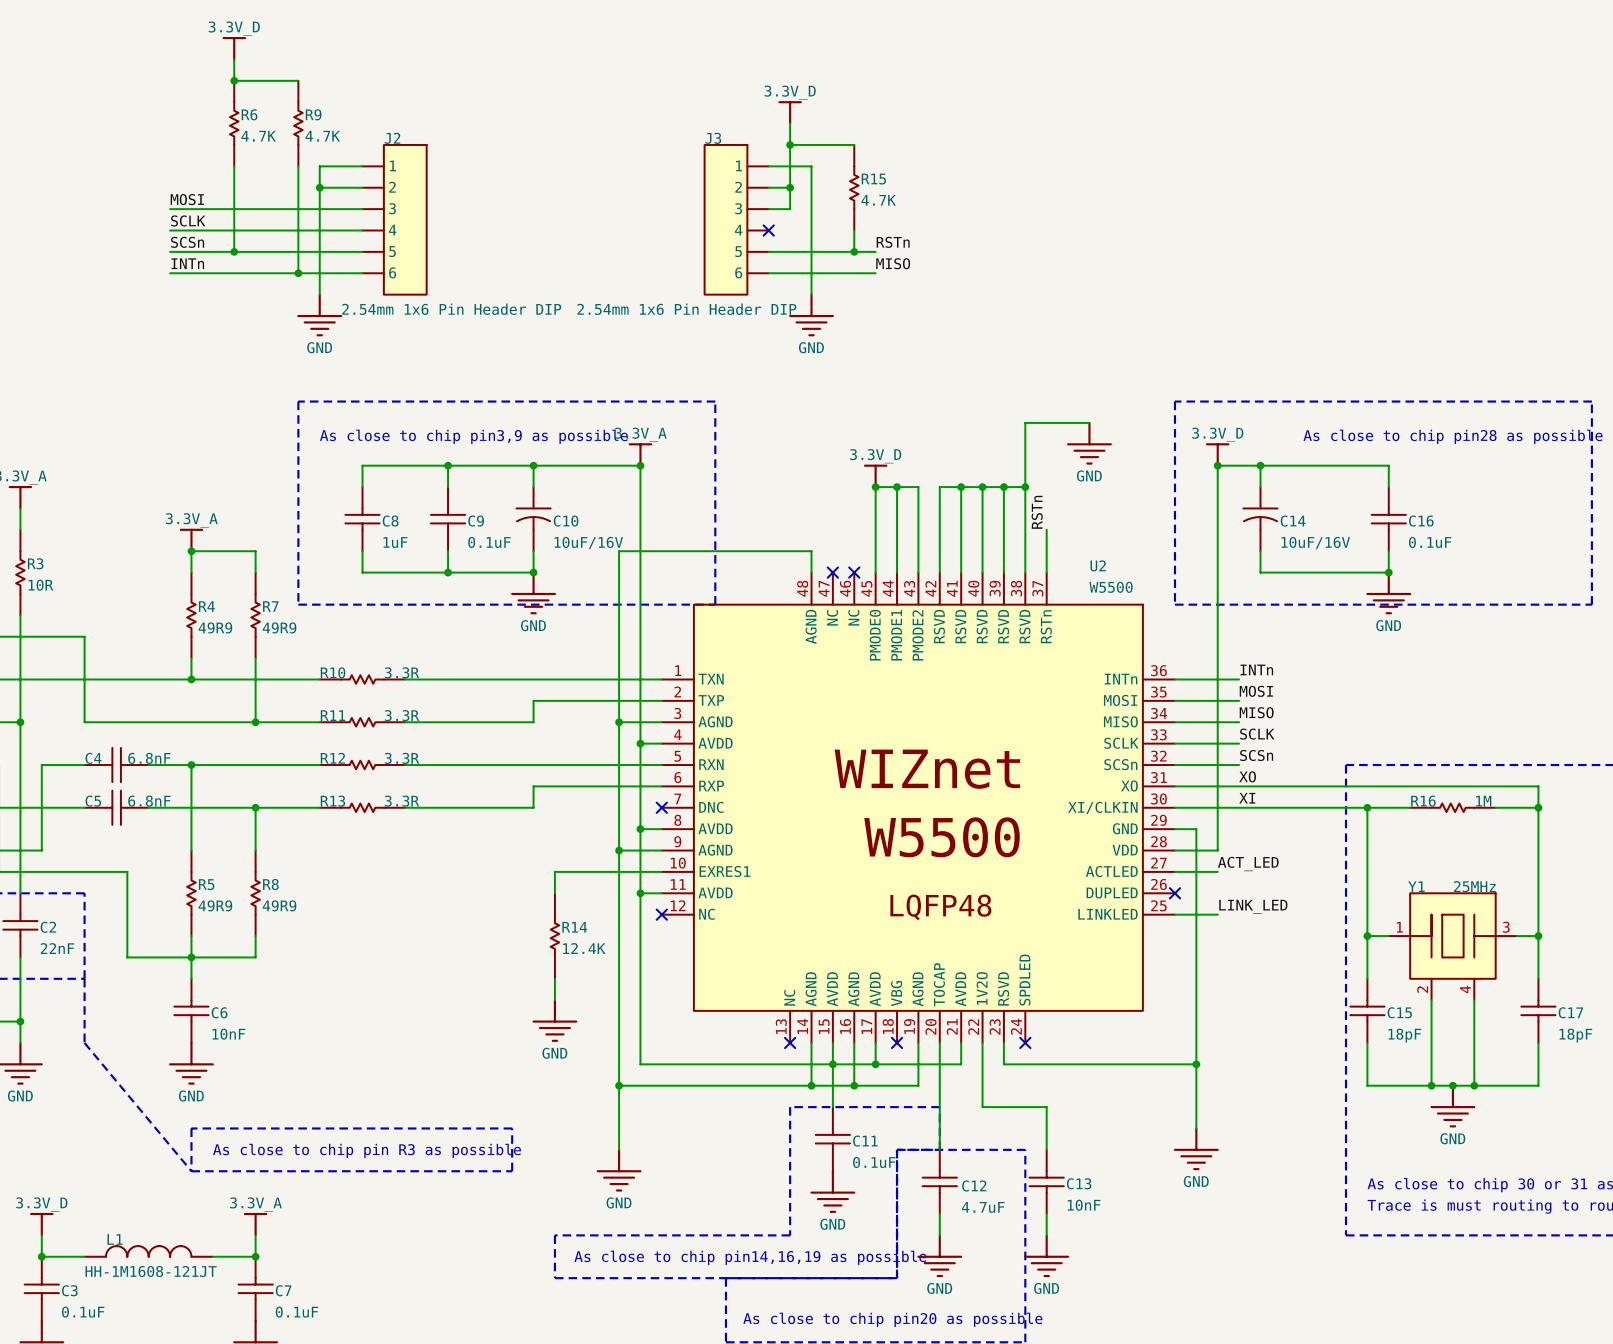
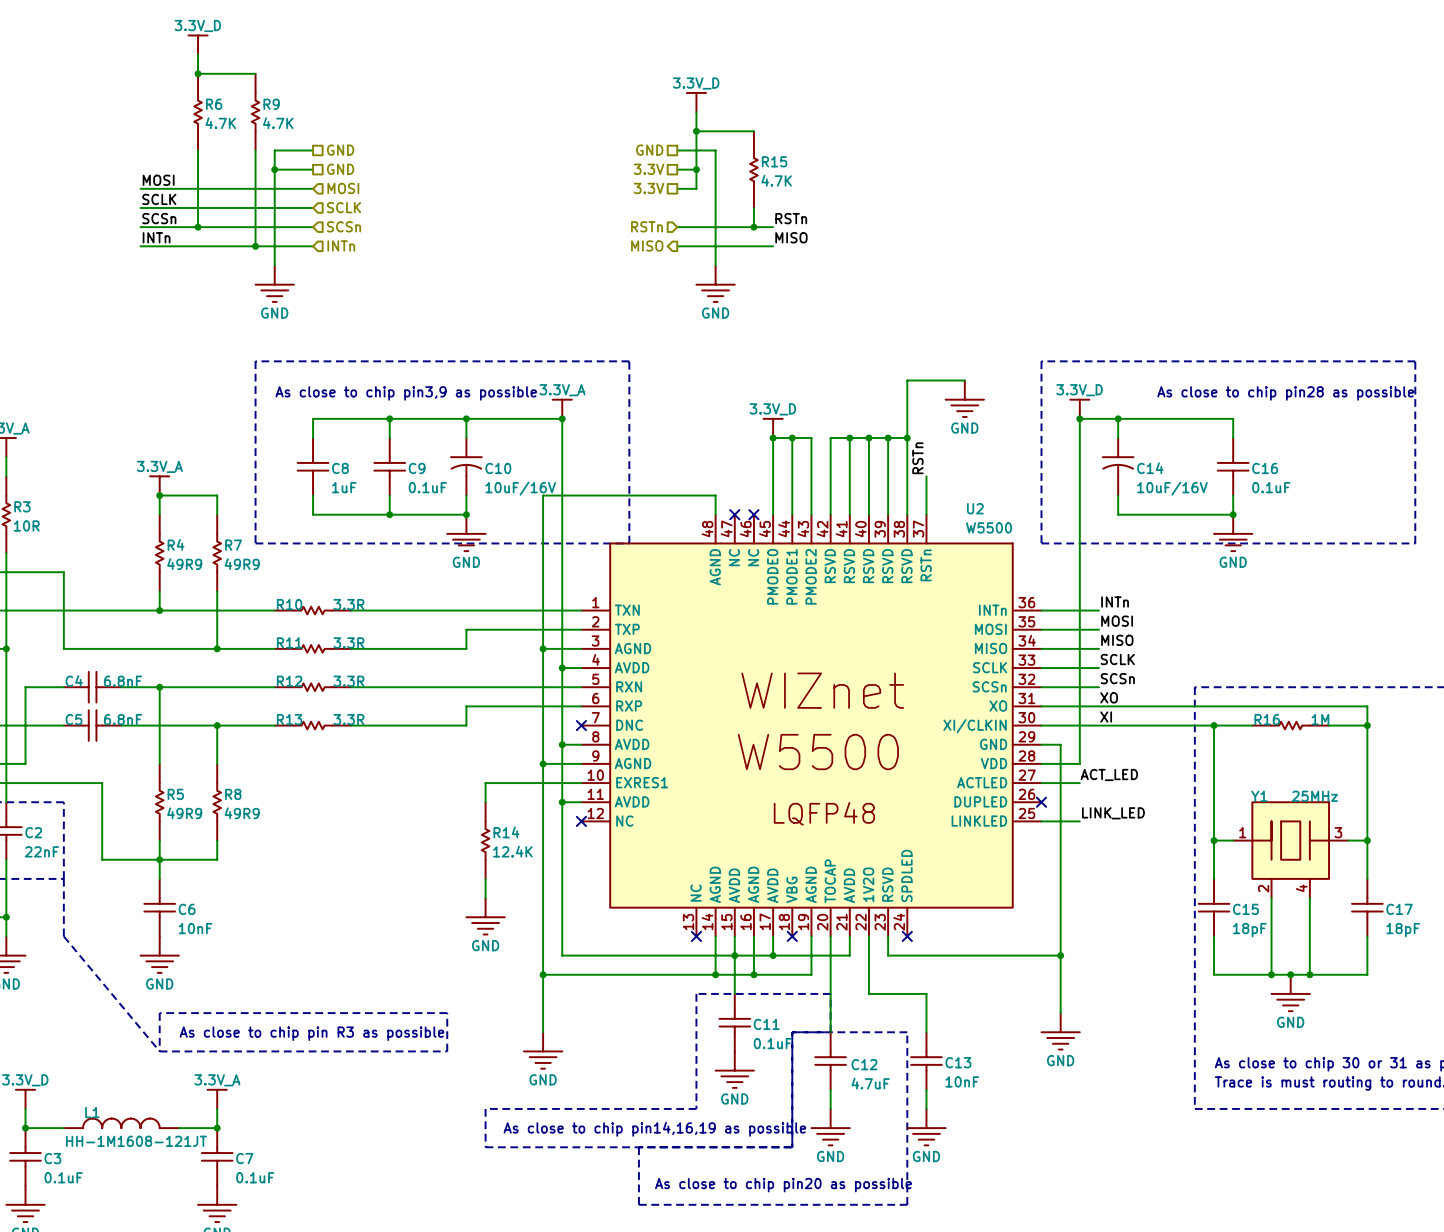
hierarchical label: none -> GND (340, 150)
hierarchical label: none -> GND (649, 150)
hierarchical label: none -> GND (340, 169)
hierarchical label: none -> 3.3V (649, 169)
hierarchical label: none -> MOSI (343, 188)
hierarchical label: none -> 3.3V (649, 188)
J2: 2.54mm 1x6 Pin Header DIP (394, 219) -> none
J3: 2.54mm 1x6 Pin Header DIP (736, 219) -> none
hierarchical label: none -> SCLK (344, 207)
no-connect mark: (768, 230) -> none
hierarchical label: none -> SCSn (344, 226)
hierarchical label: none -> RSTn (647, 226)
hierarchical label: none -> INTn (341, 245)
hierarchical label: none -> MISO (647, 245)

